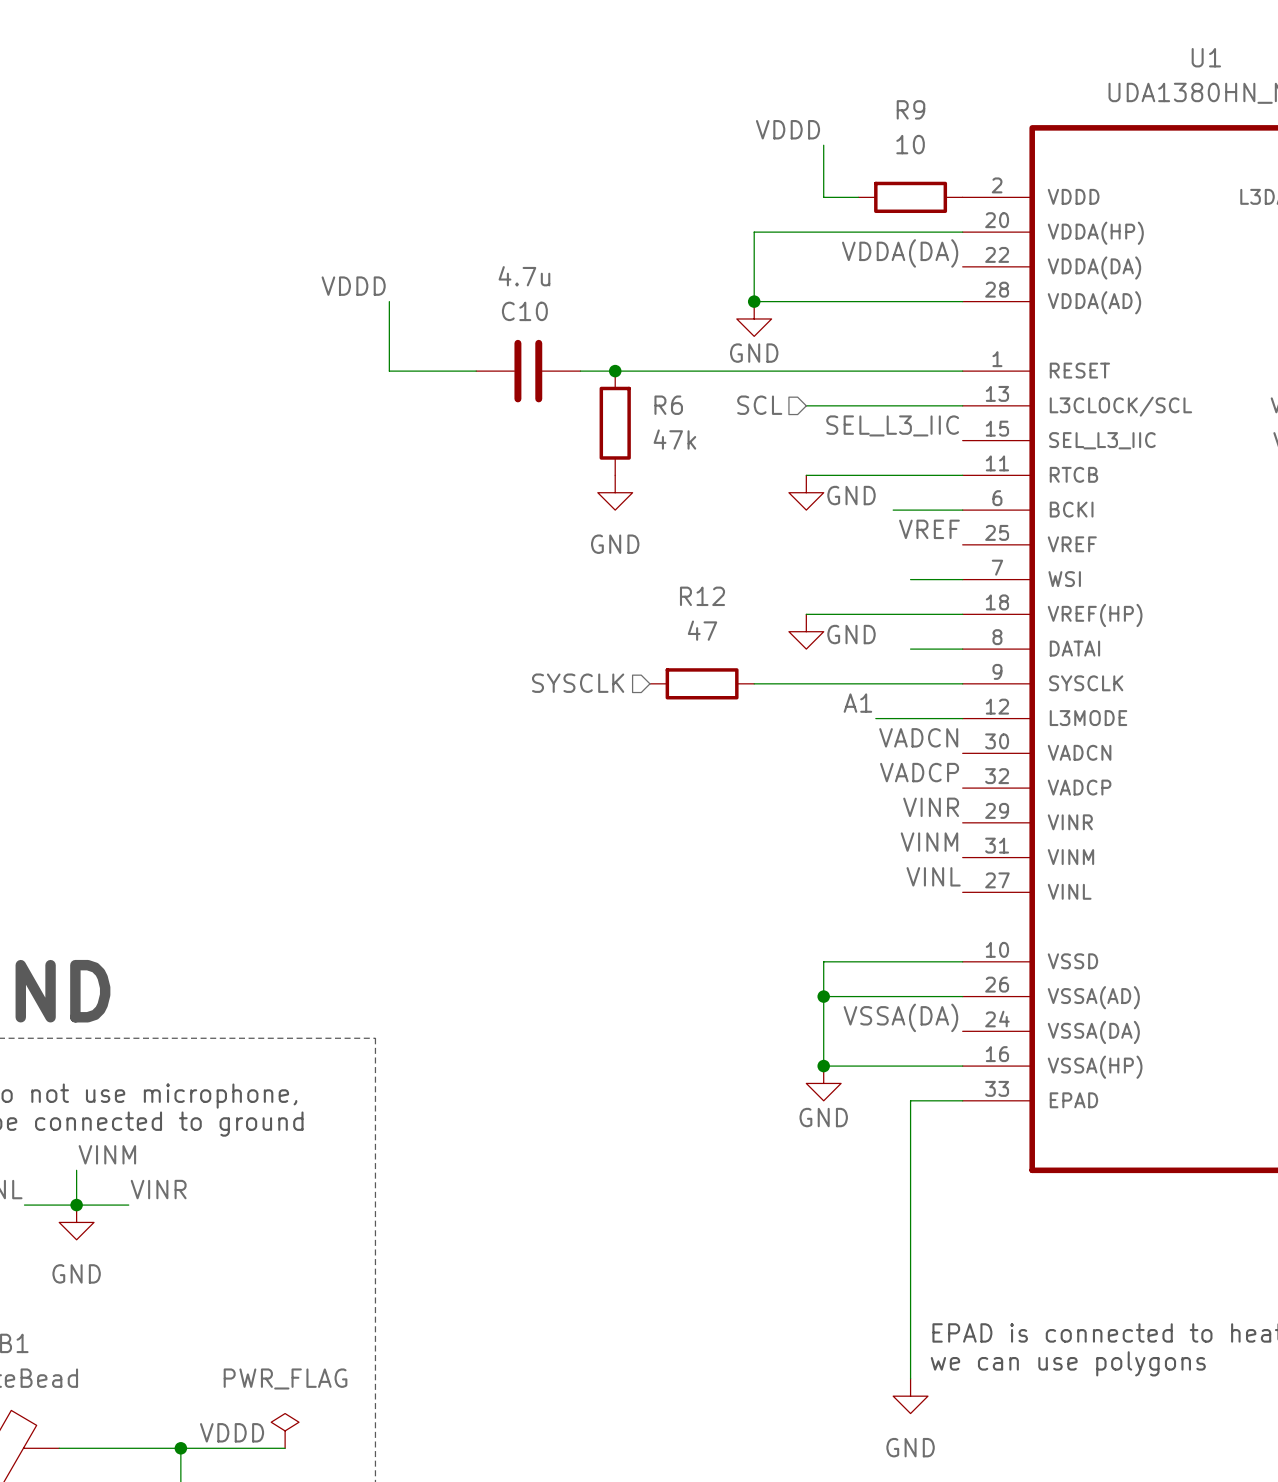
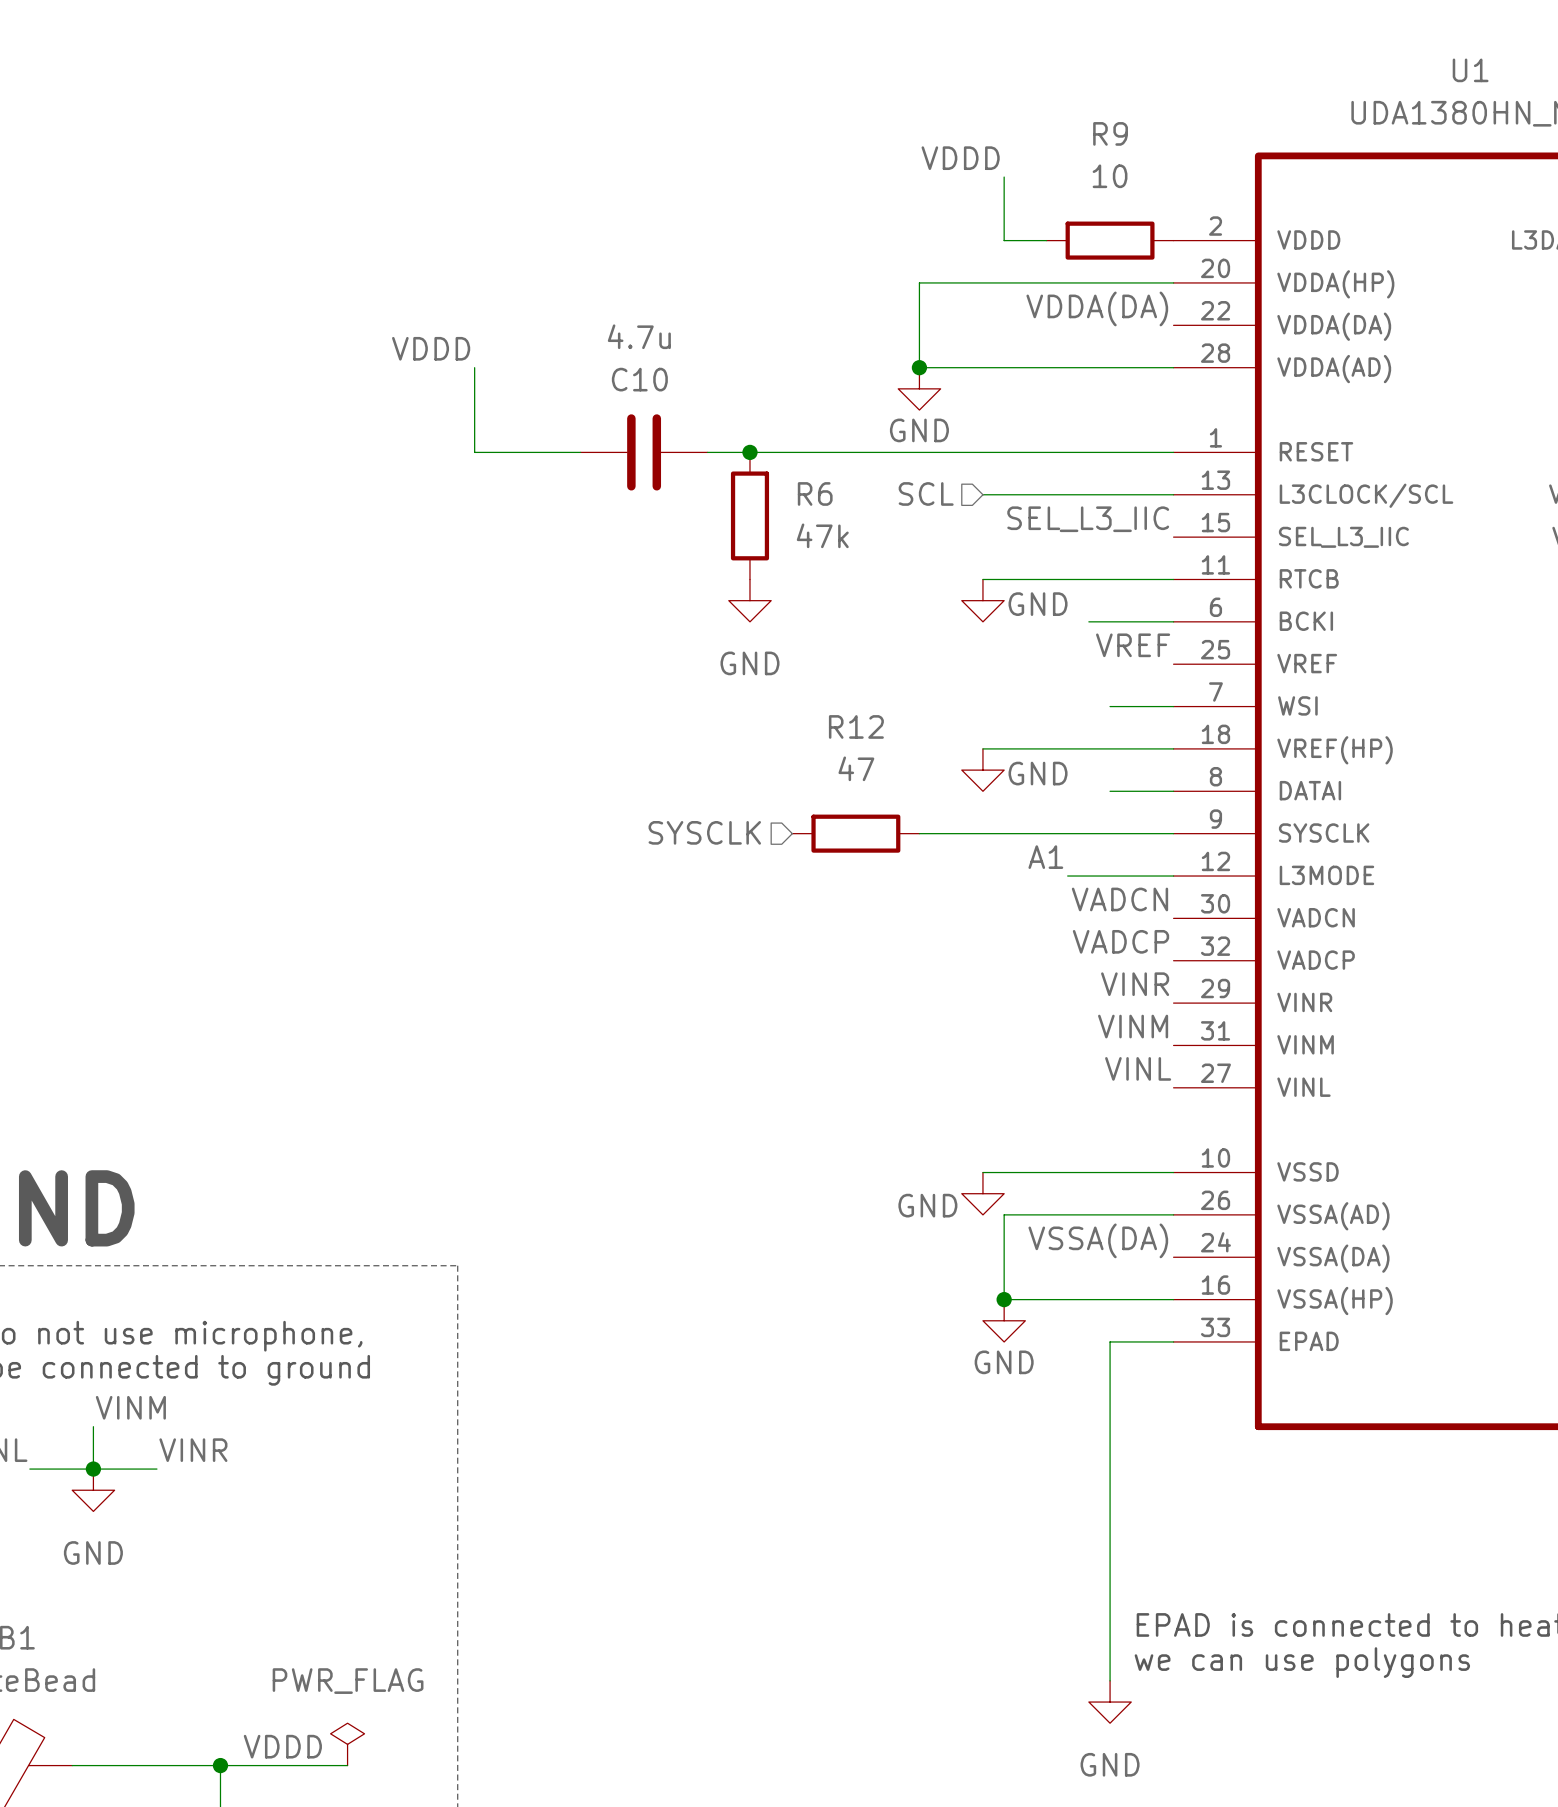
wire: (823, 961) (823, 996) -> (1004, 1172) (982, 1172)
power symbol: none -> GND (982, 1193)
junction: (823, 996) -> none

